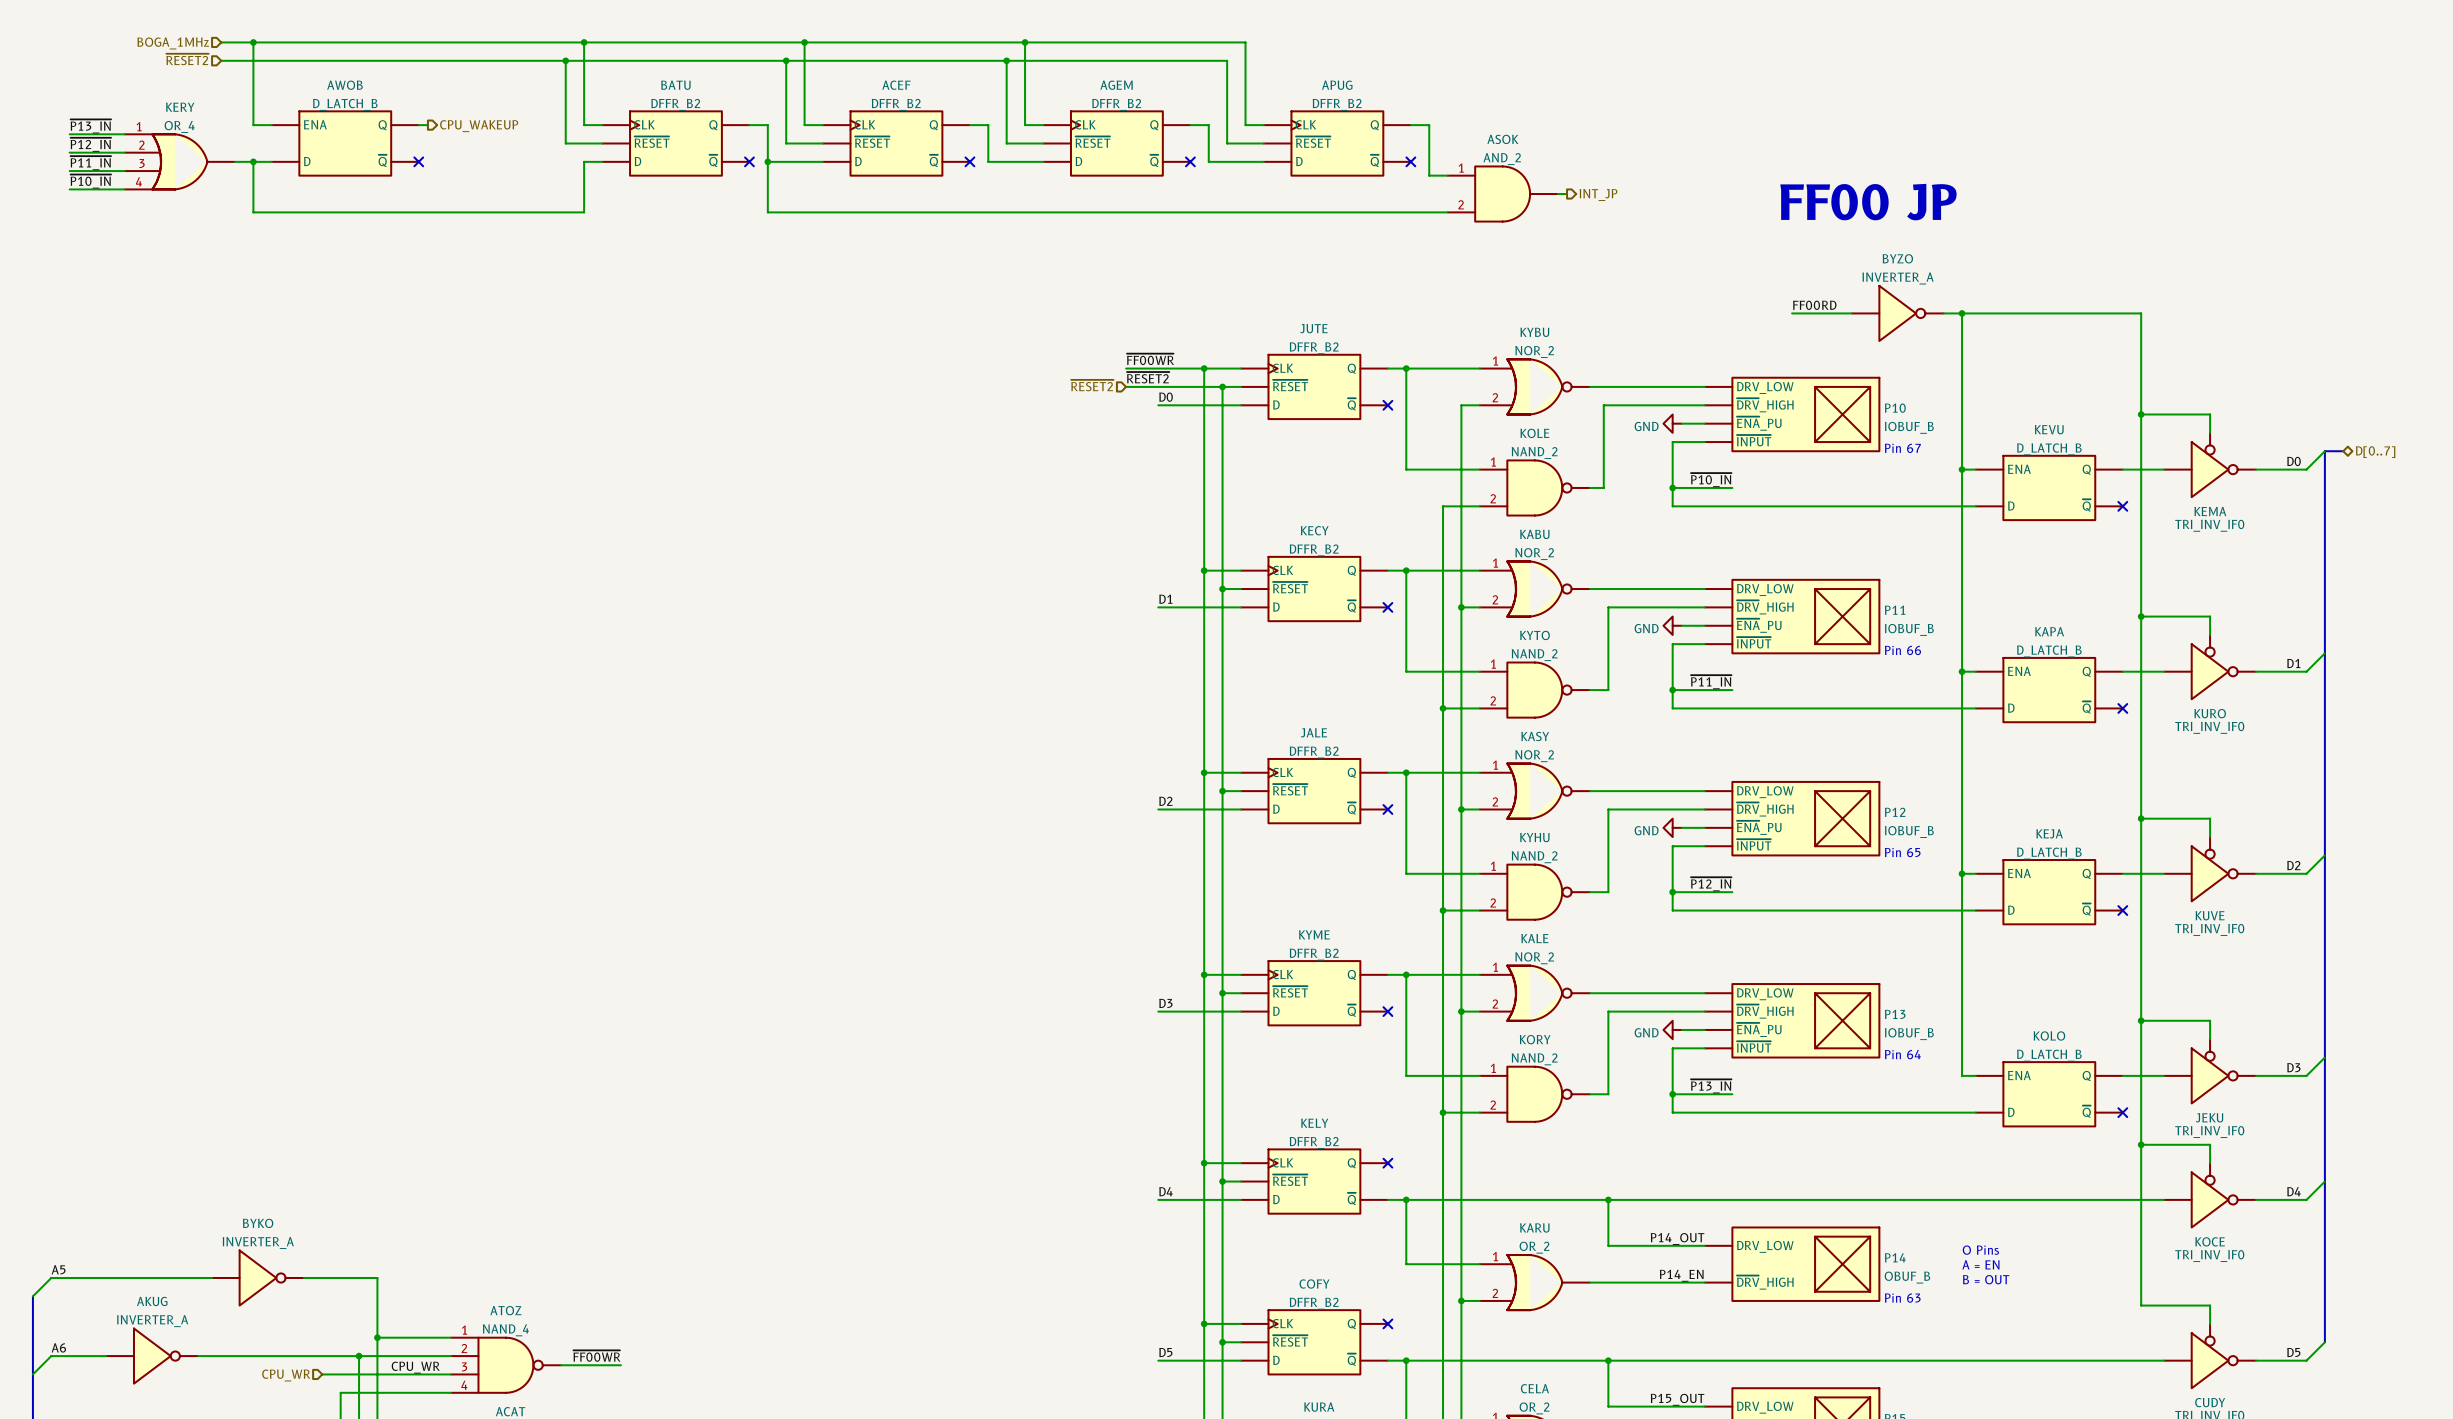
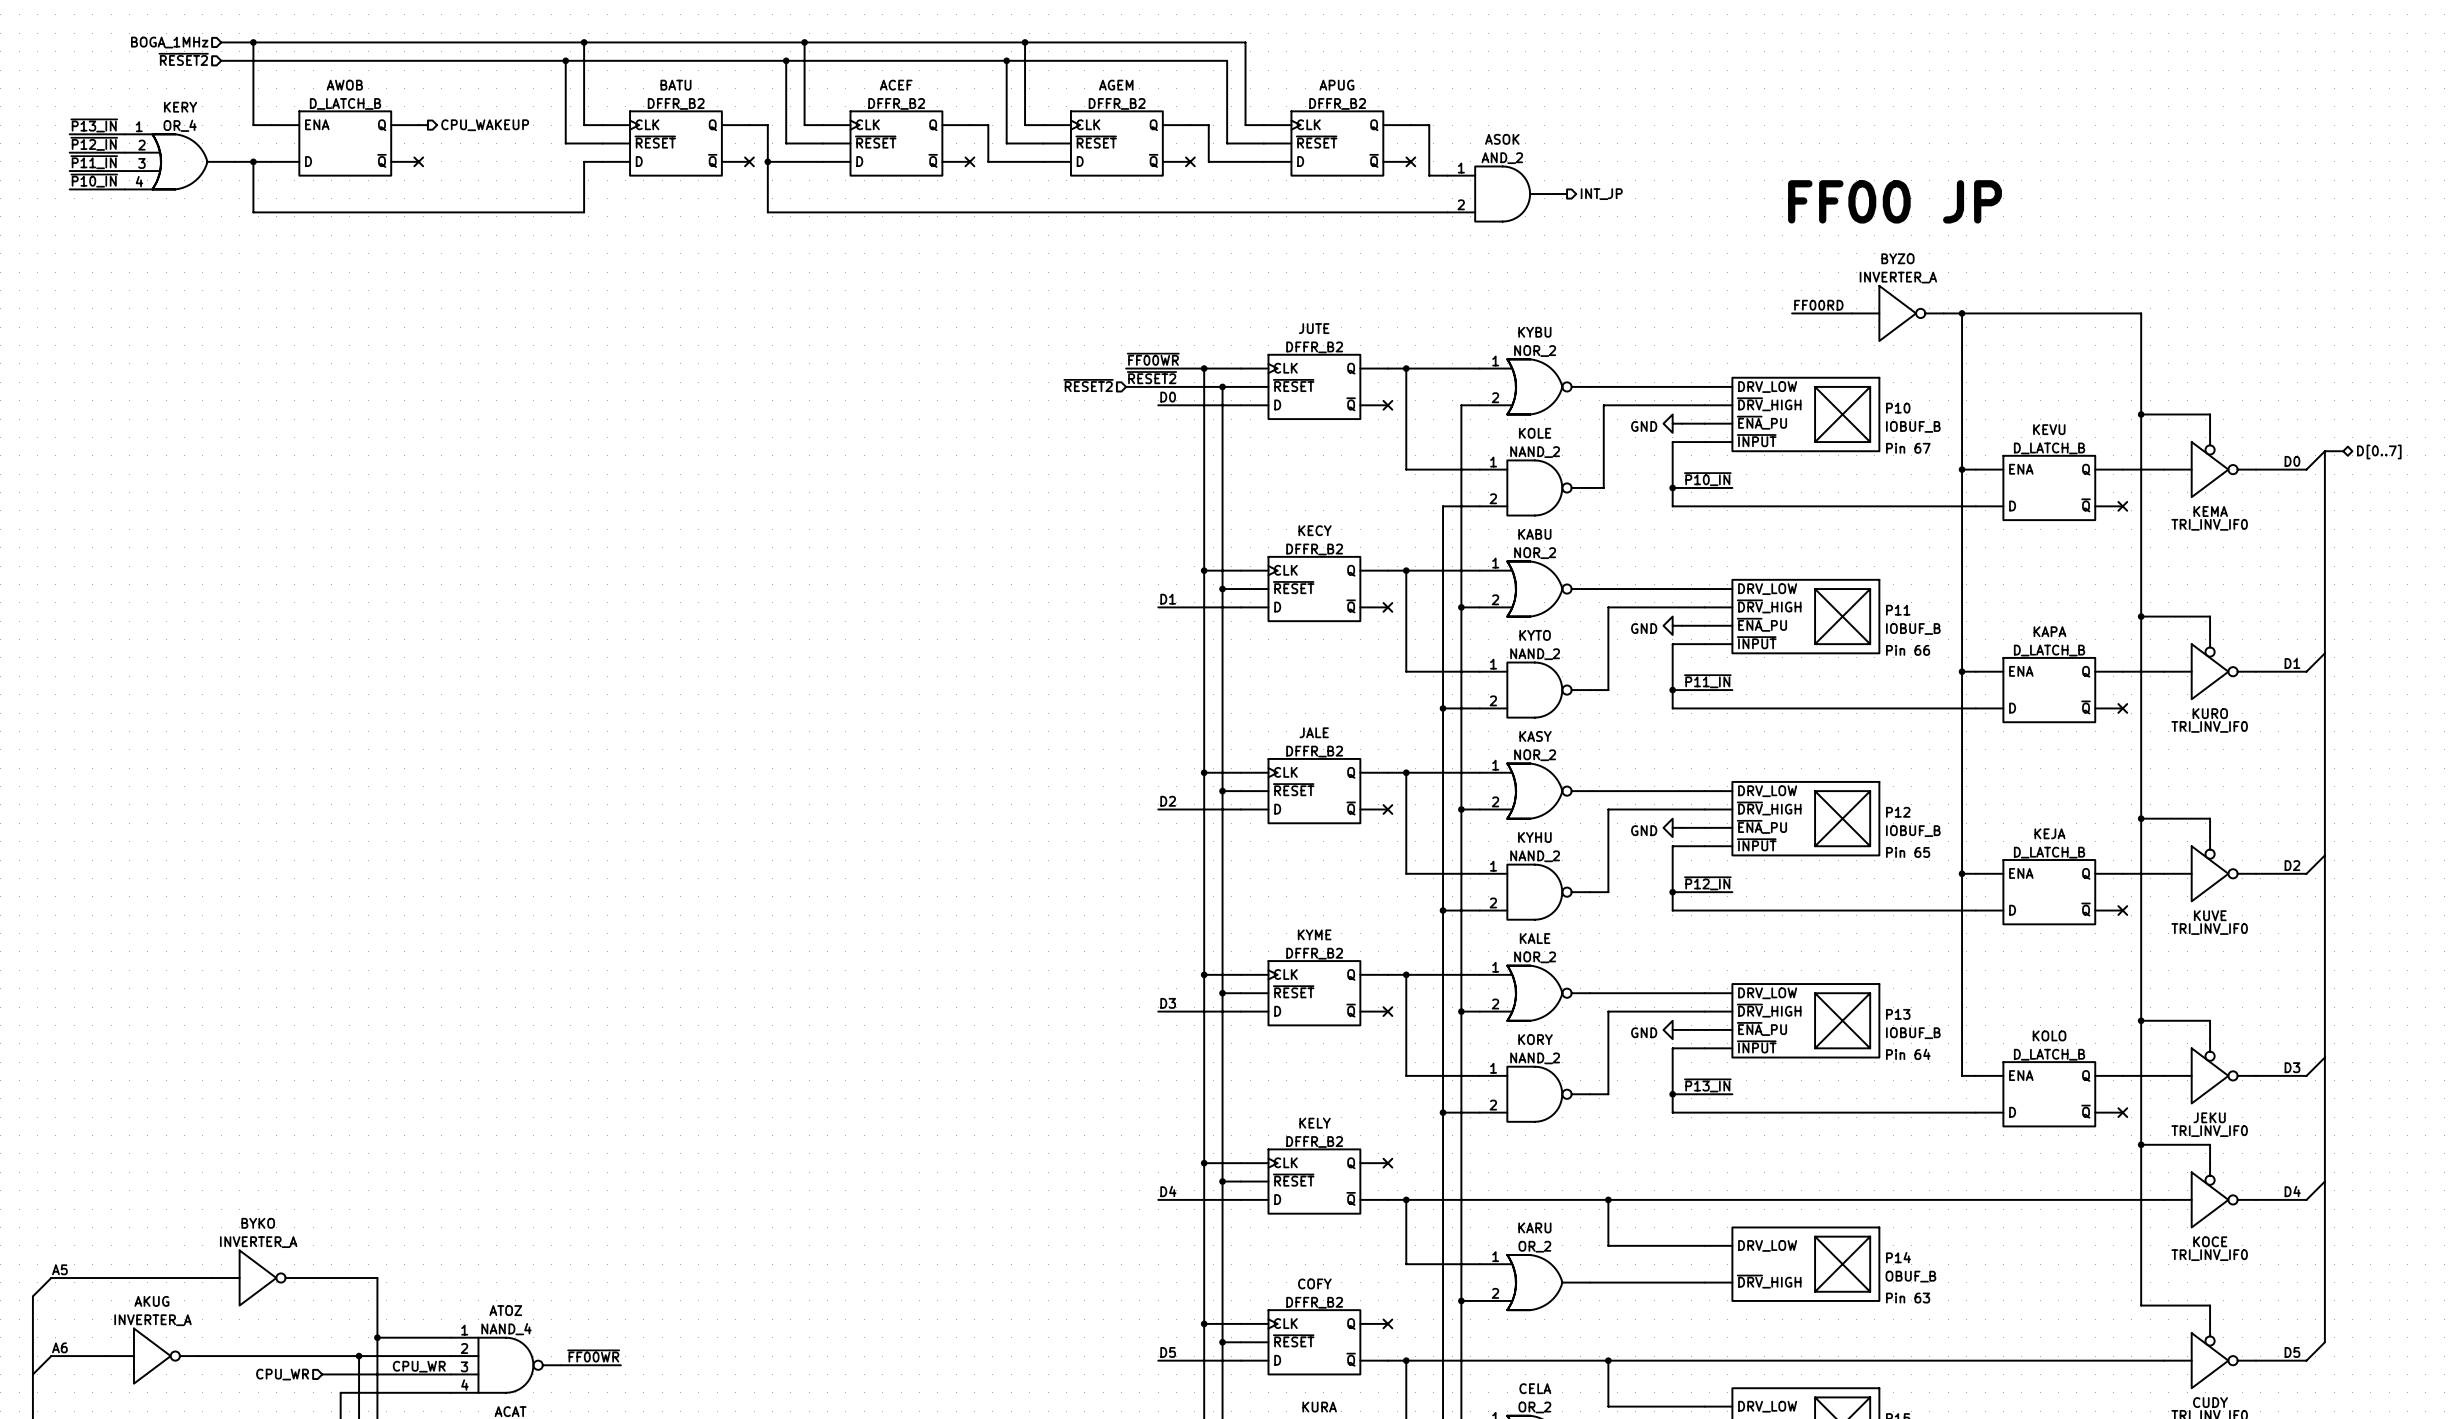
label: P14_OUT (1677, 1239) -> none
text: O Pins (1980, 1250) -> none
text: A = EN (1980, 1264) -> none
label: P14_EN (1681, 1275) -> none
text: B = OUT (1986, 1279) -> none
label: P15_OUT (1677, 1399) -> none

